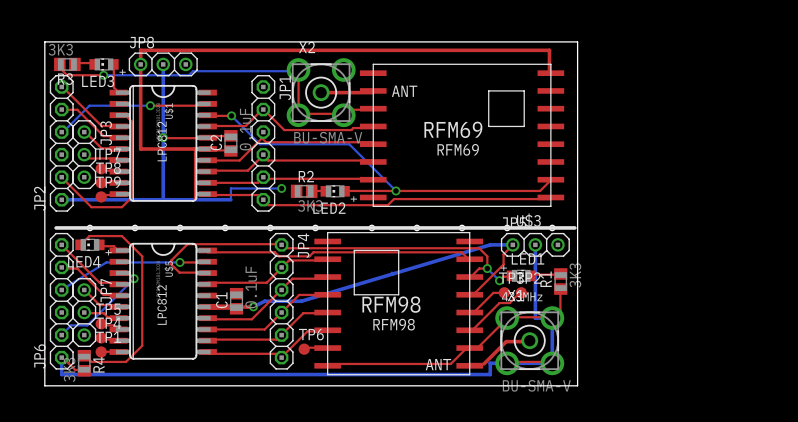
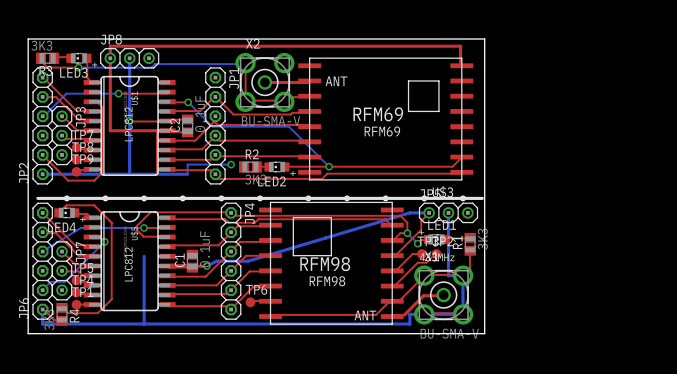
bottom track: none -> (144, 256) (144, 324)

